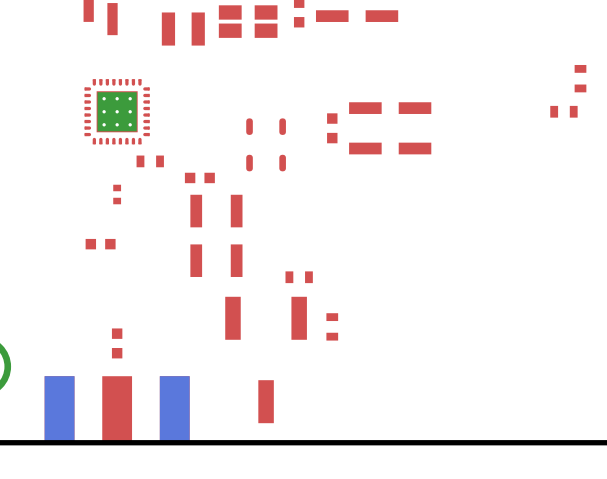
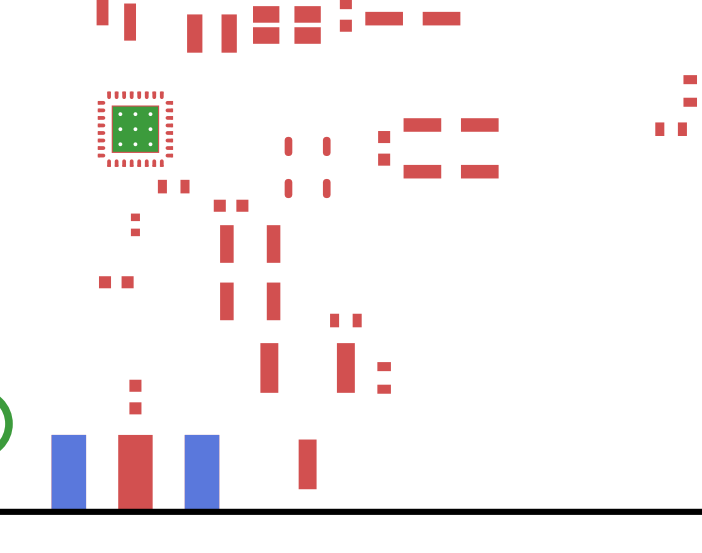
part: (580, 78) -> none
part: none -> (690, 90)
part: (563, 111) -> none
part: none -> (671, 129)

